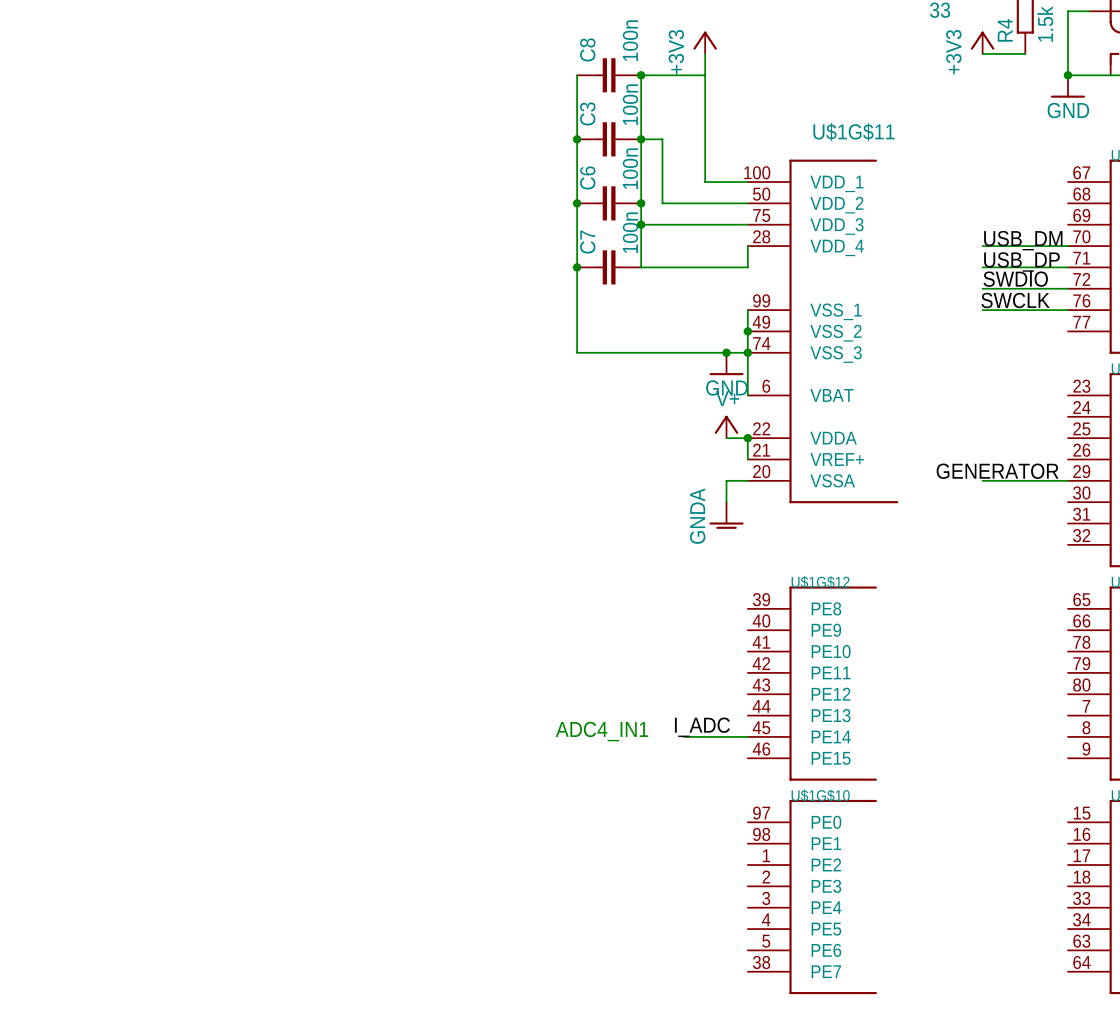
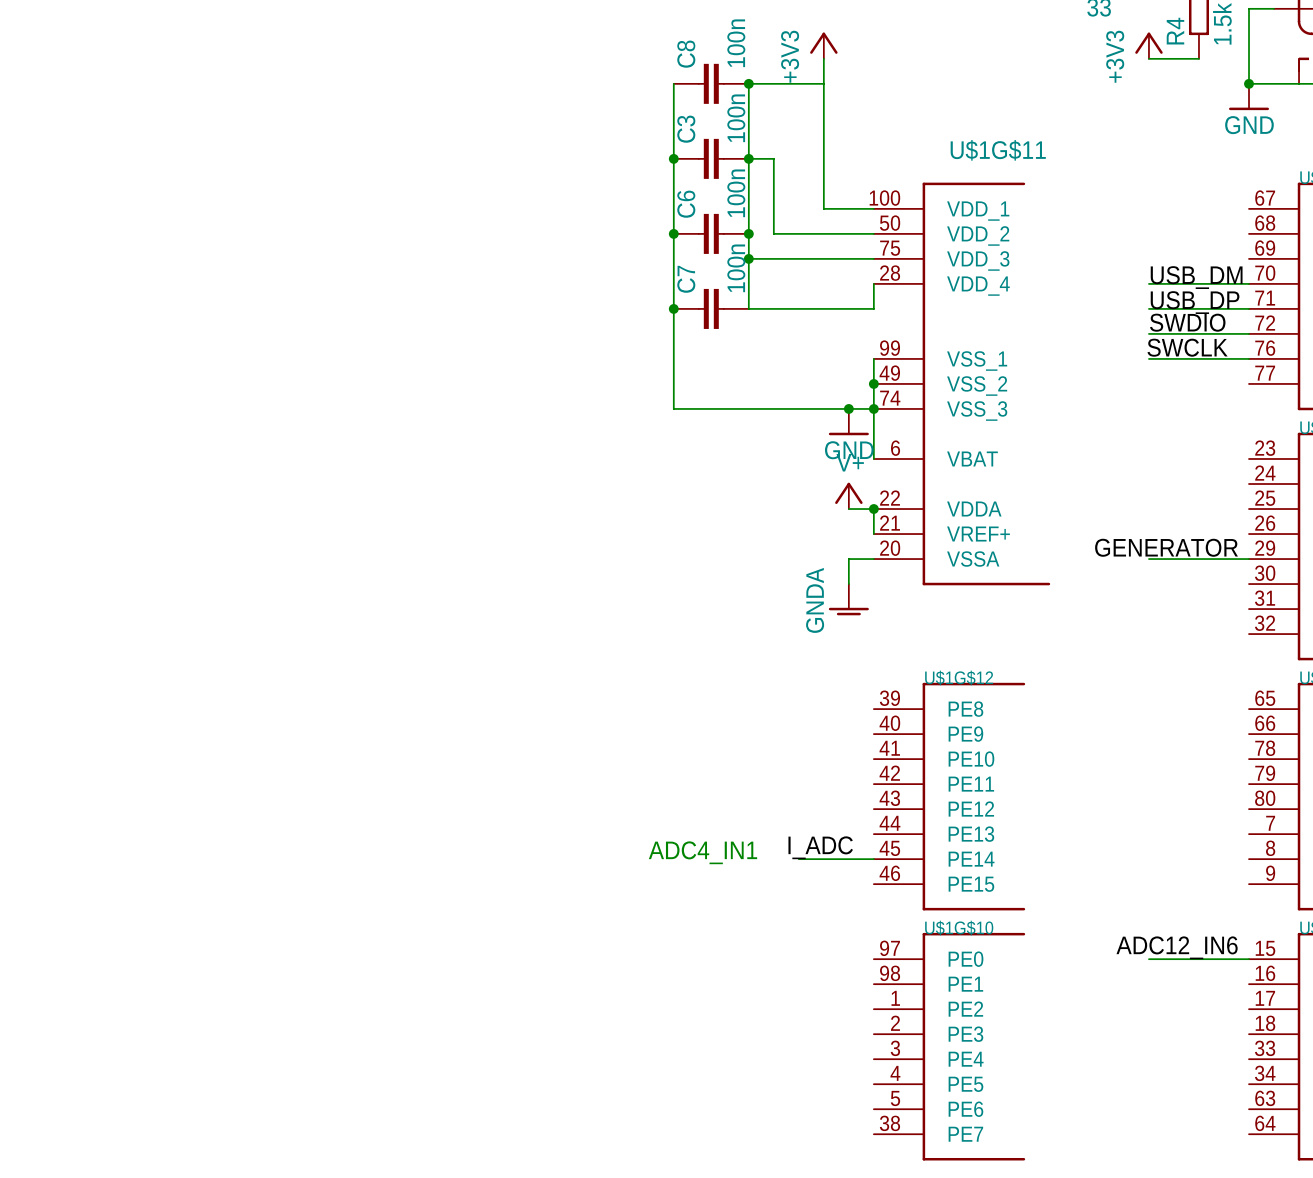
label: none -> ADC12_IN6 (1177, 947)
wire: none -> (1148, 959) (1249, 959)

